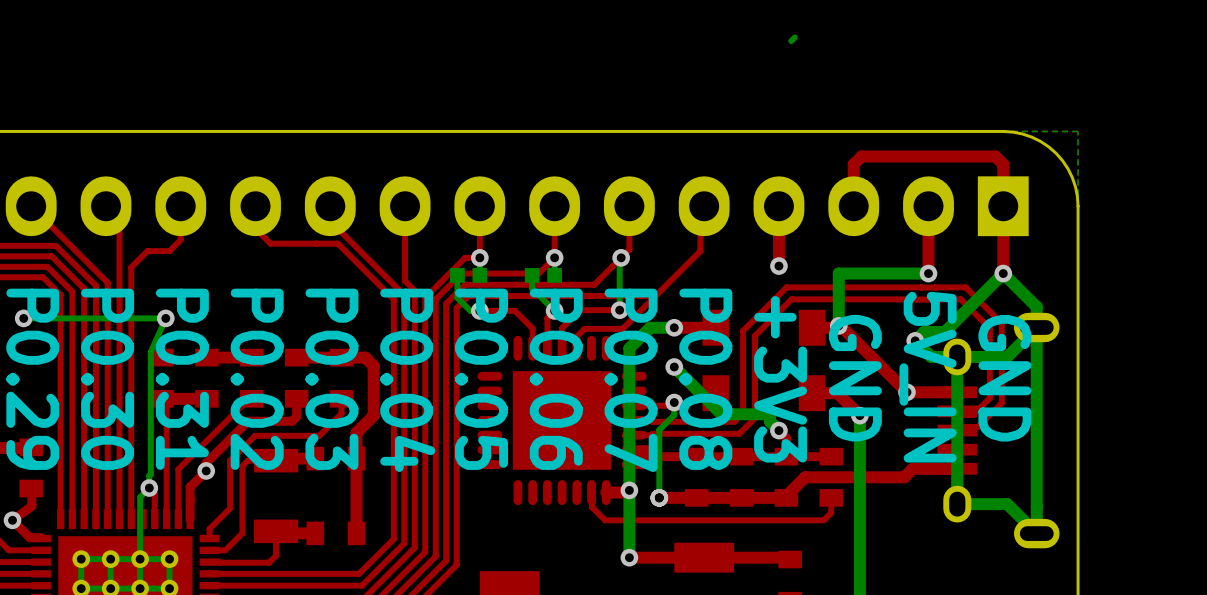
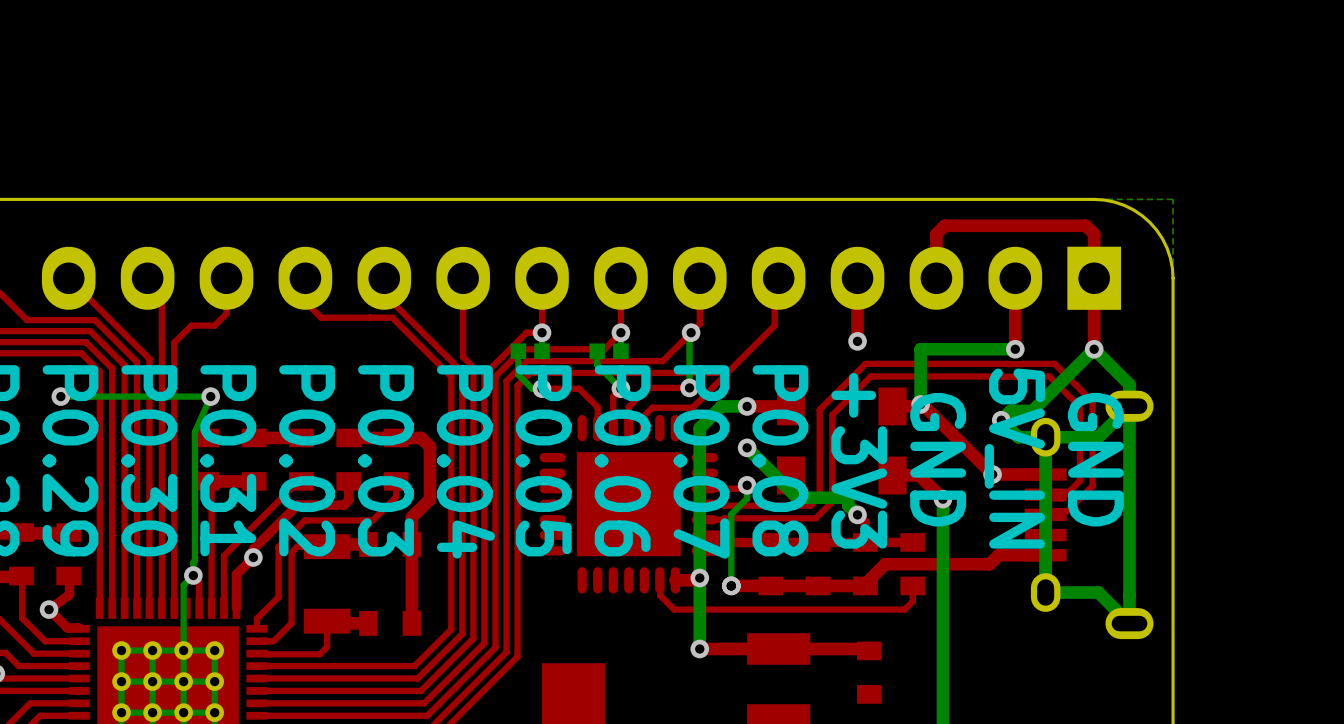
bottom track: (794, 37) (791, 41) -> none

